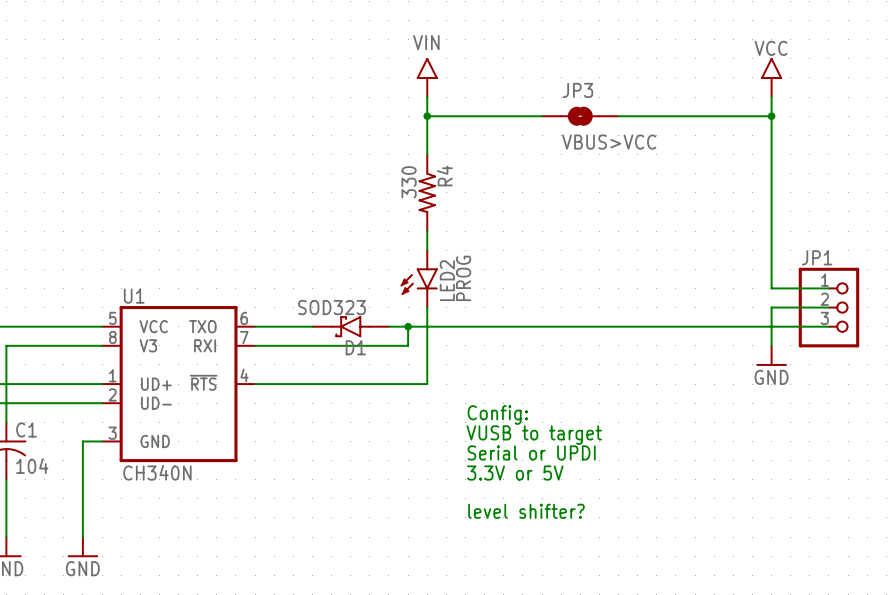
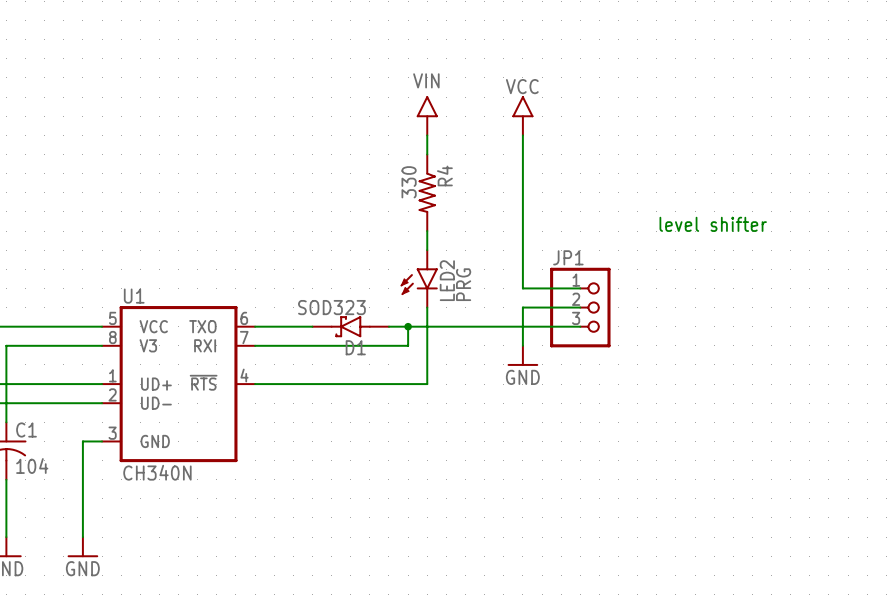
power symbol position: (427, 77) -> (427, 115)
power symbol: (771, 77) -> none
wire: (771, 97) (771, 288) (828, 288) -> none
power symbol: none -> (522, 115)
wire: (427, 116) (542, 116) -> none
junction: (427, 116) -> none
JP3: VBUS>VCC (580, 116) -> none
wire: (618, 116) (771, 116) -> none
junction: (771, 116) -> none
wire: none -> (522, 135) (522, 288) (580, 288)
text: none -> level shifter (713, 224)
LED2 value: PROG (463, 278) -> PRG (463, 284)
wire: none -> (580, 307) (522, 307) (522, 345)
wire: (828, 307) (771, 307) (771, 345) -> none
JP1 position: (828, 307) -> (580, 307)
wire: (580, 326) (828, 326) -> none
power symbol: none -> GND (522, 355)
power symbol: GND (771, 355) -> none
text: Config: (497, 415) -> none
text: VUSB to target (534, 435) -> none
text: Serial or UPDI (531, 452) -> none
text: 3.3V or 5V (515, 473) -> none
text: level shifter? (526, 511) -> none

